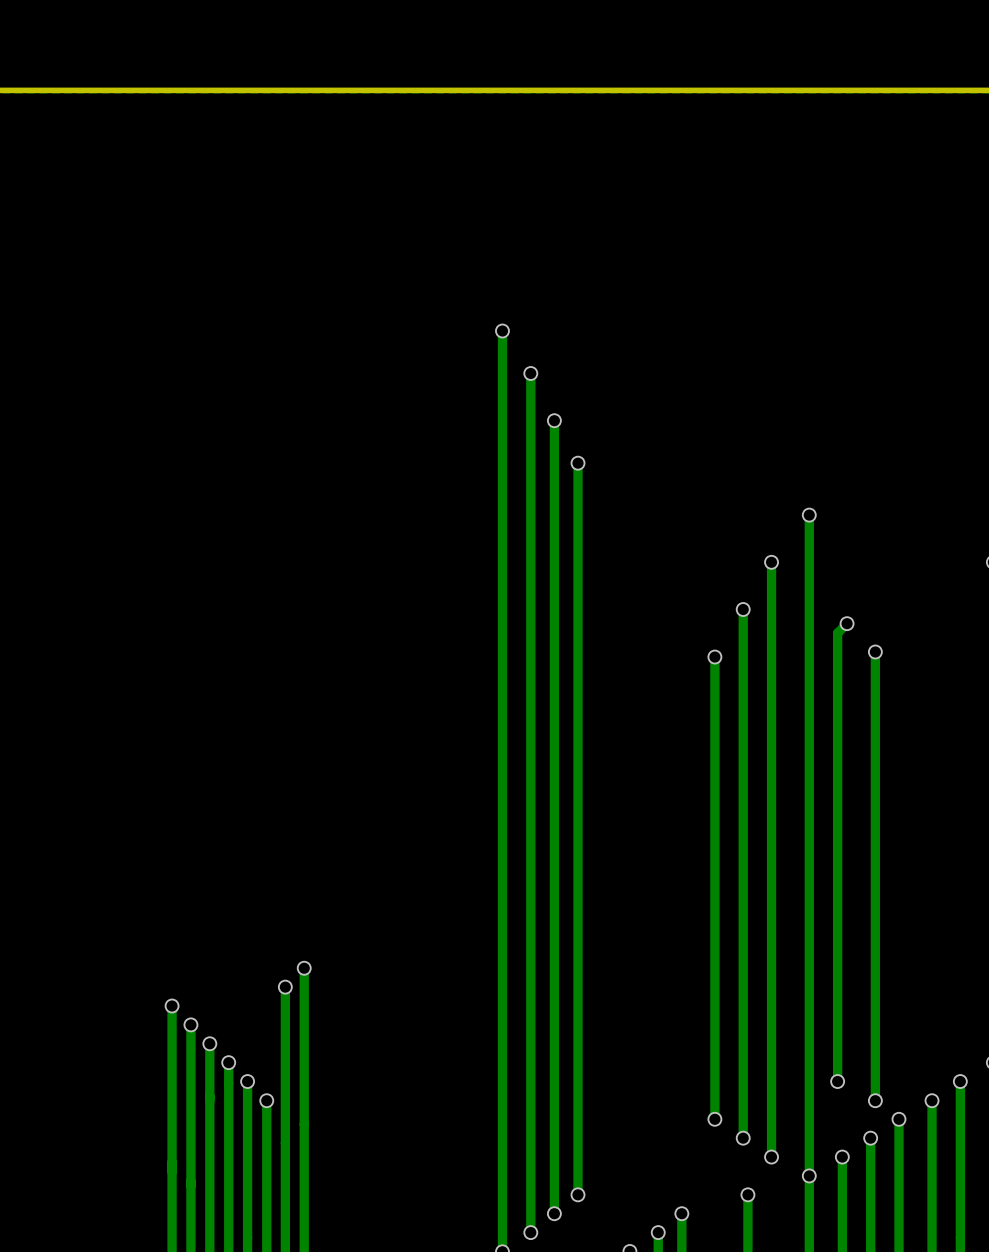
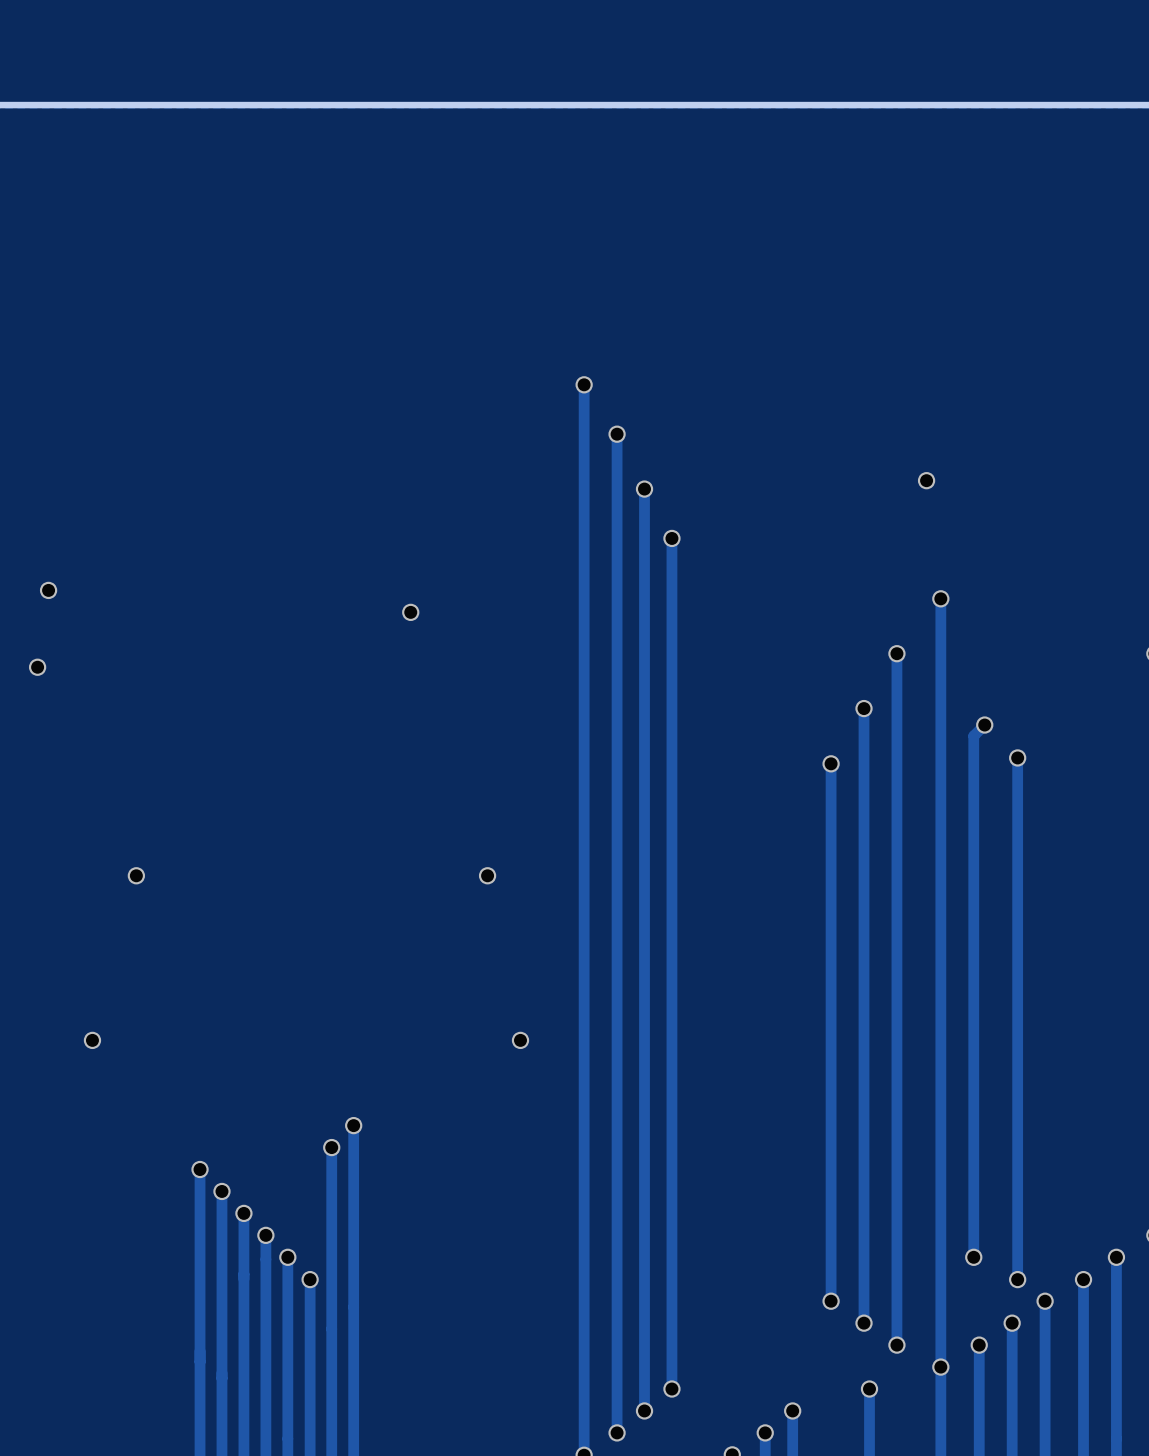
via: none -> (926, 480)
via: none -> (48, 590)
via: none -> (410, 612)
via: none -> (37, 667)
via: none -> (136, 875)
via: none -> (487, 875)
via: none -> (92, 1040)
via: none -> (520, 1040)

